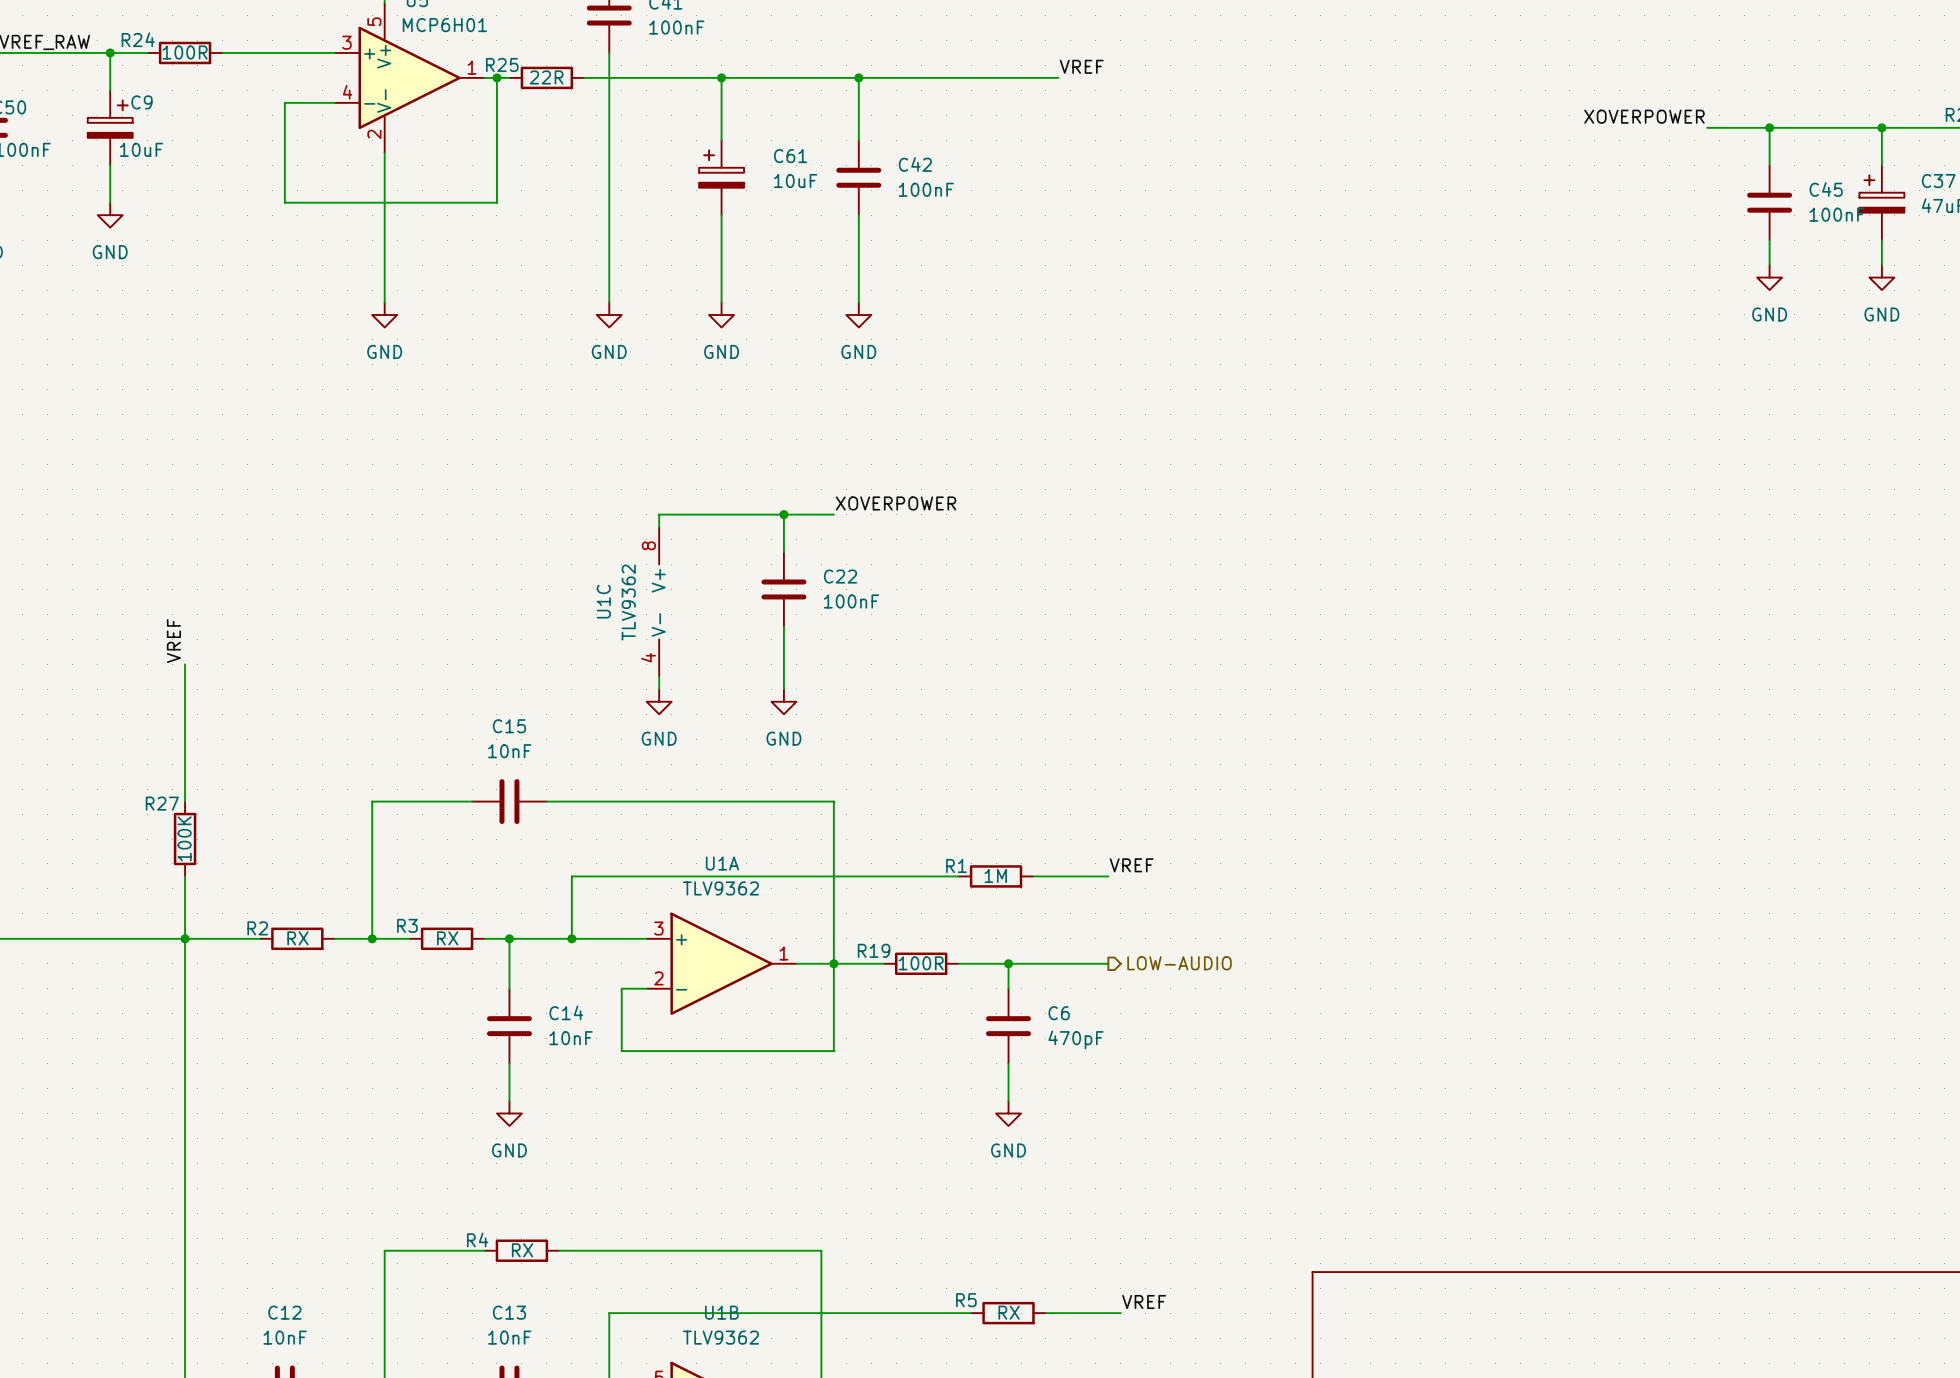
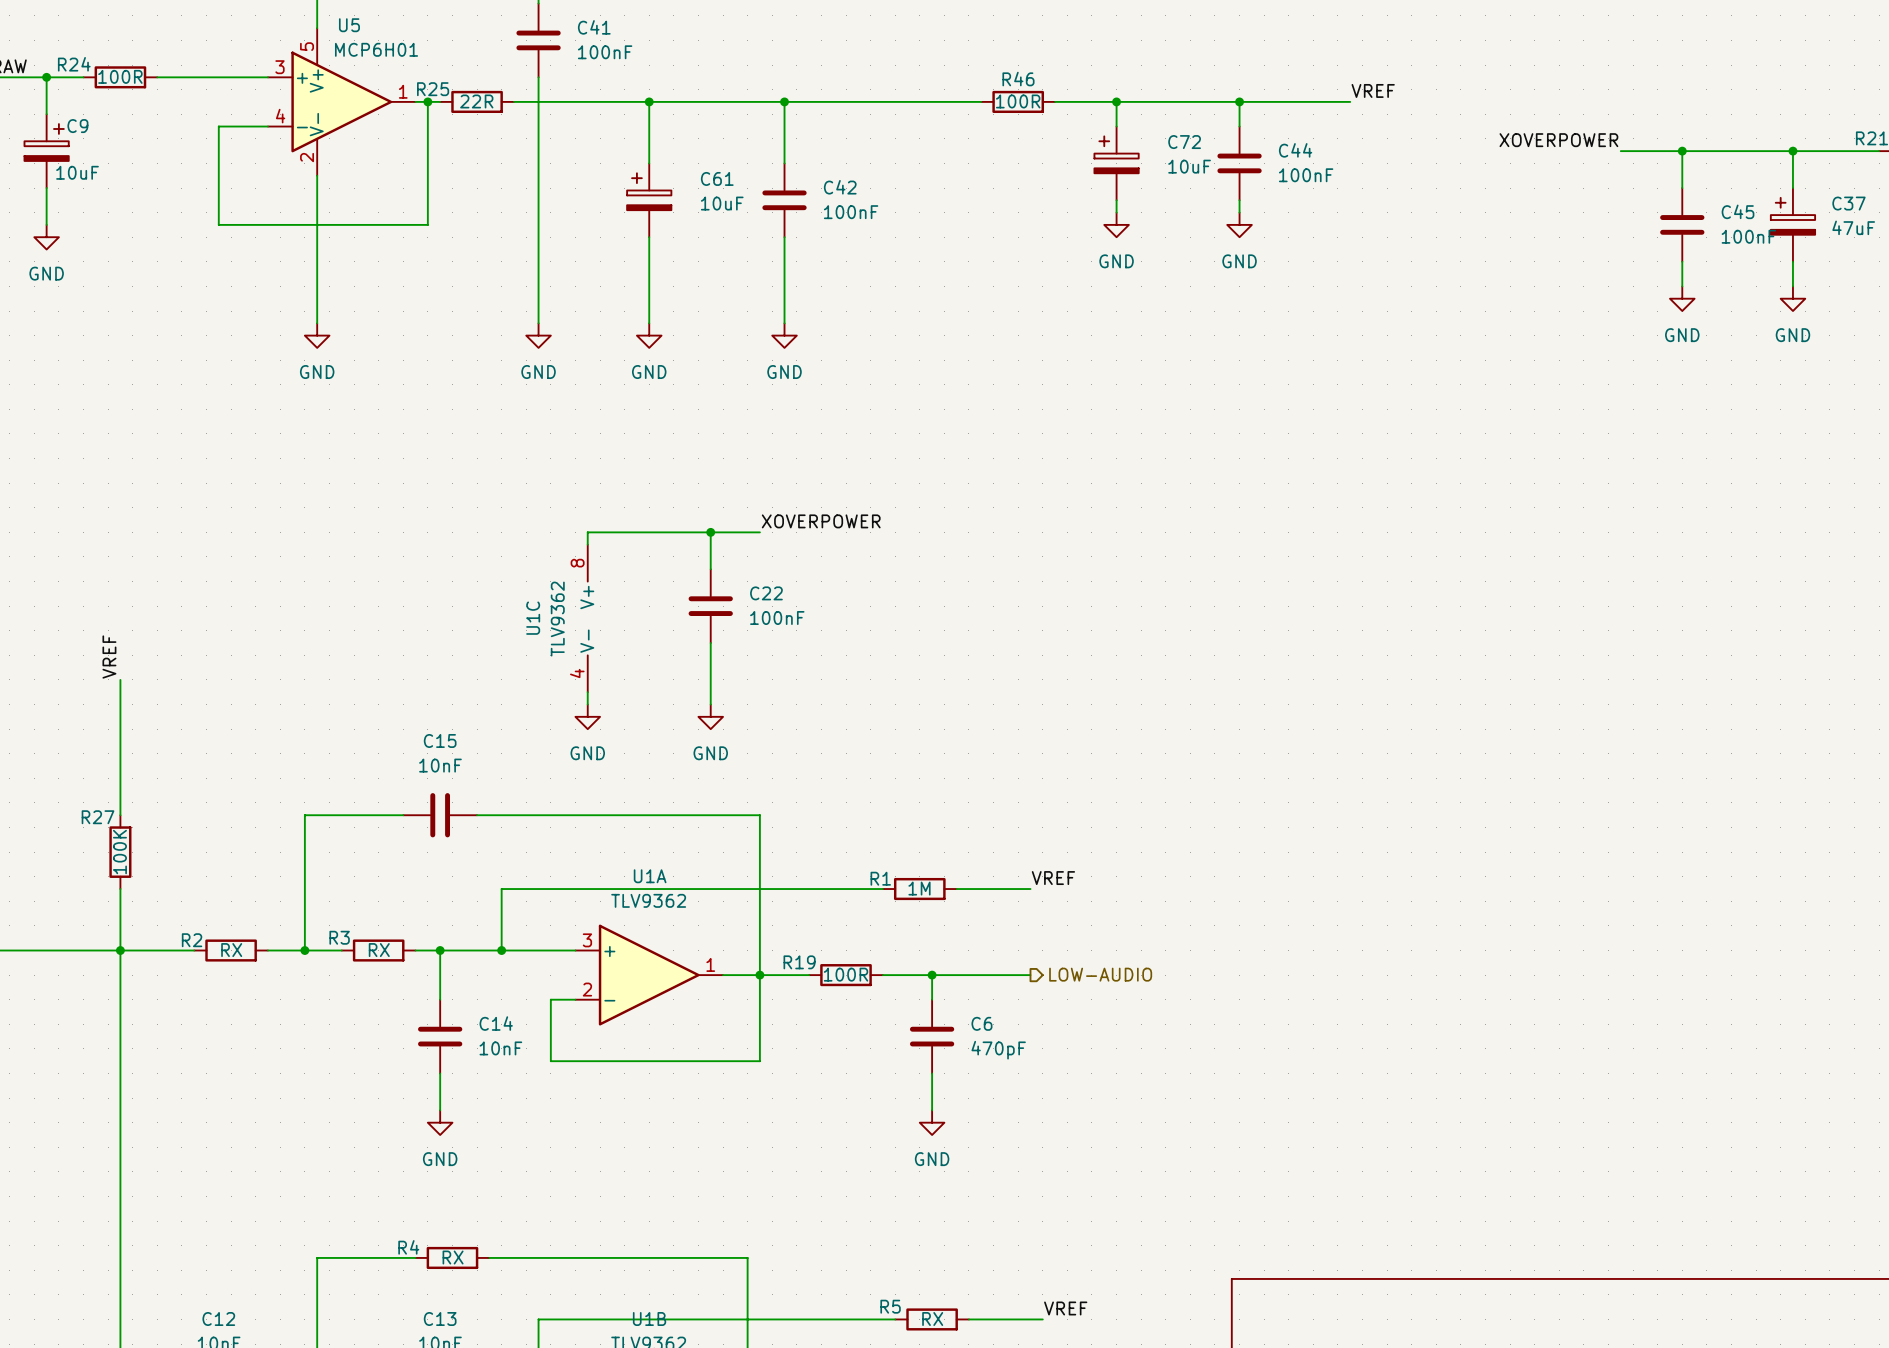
label: VREF (1081, 66) -> none
label: none -> VREF (1373, 90)
R46: none -> 100R (1018, 101)
wire: none -> (1055, 101) (1350, 101)
wire: none -> (1116, 101) (1116, 126)
junction: none -> (1116, 101)
wire: none -> (1239, 101) (1239, 126)
junction: none -> (1239, 101)
C72: none -> 10uF (1116, 163)
C44: none -> 100nF (1239, 163)
wire: none -> (1116, 200) (1116, 212)
wire: none -> (1239, 200) (1239, 212)
power symbol: none -> GND (1116, 224)
power symbol: none -> GND (1239, 224)

